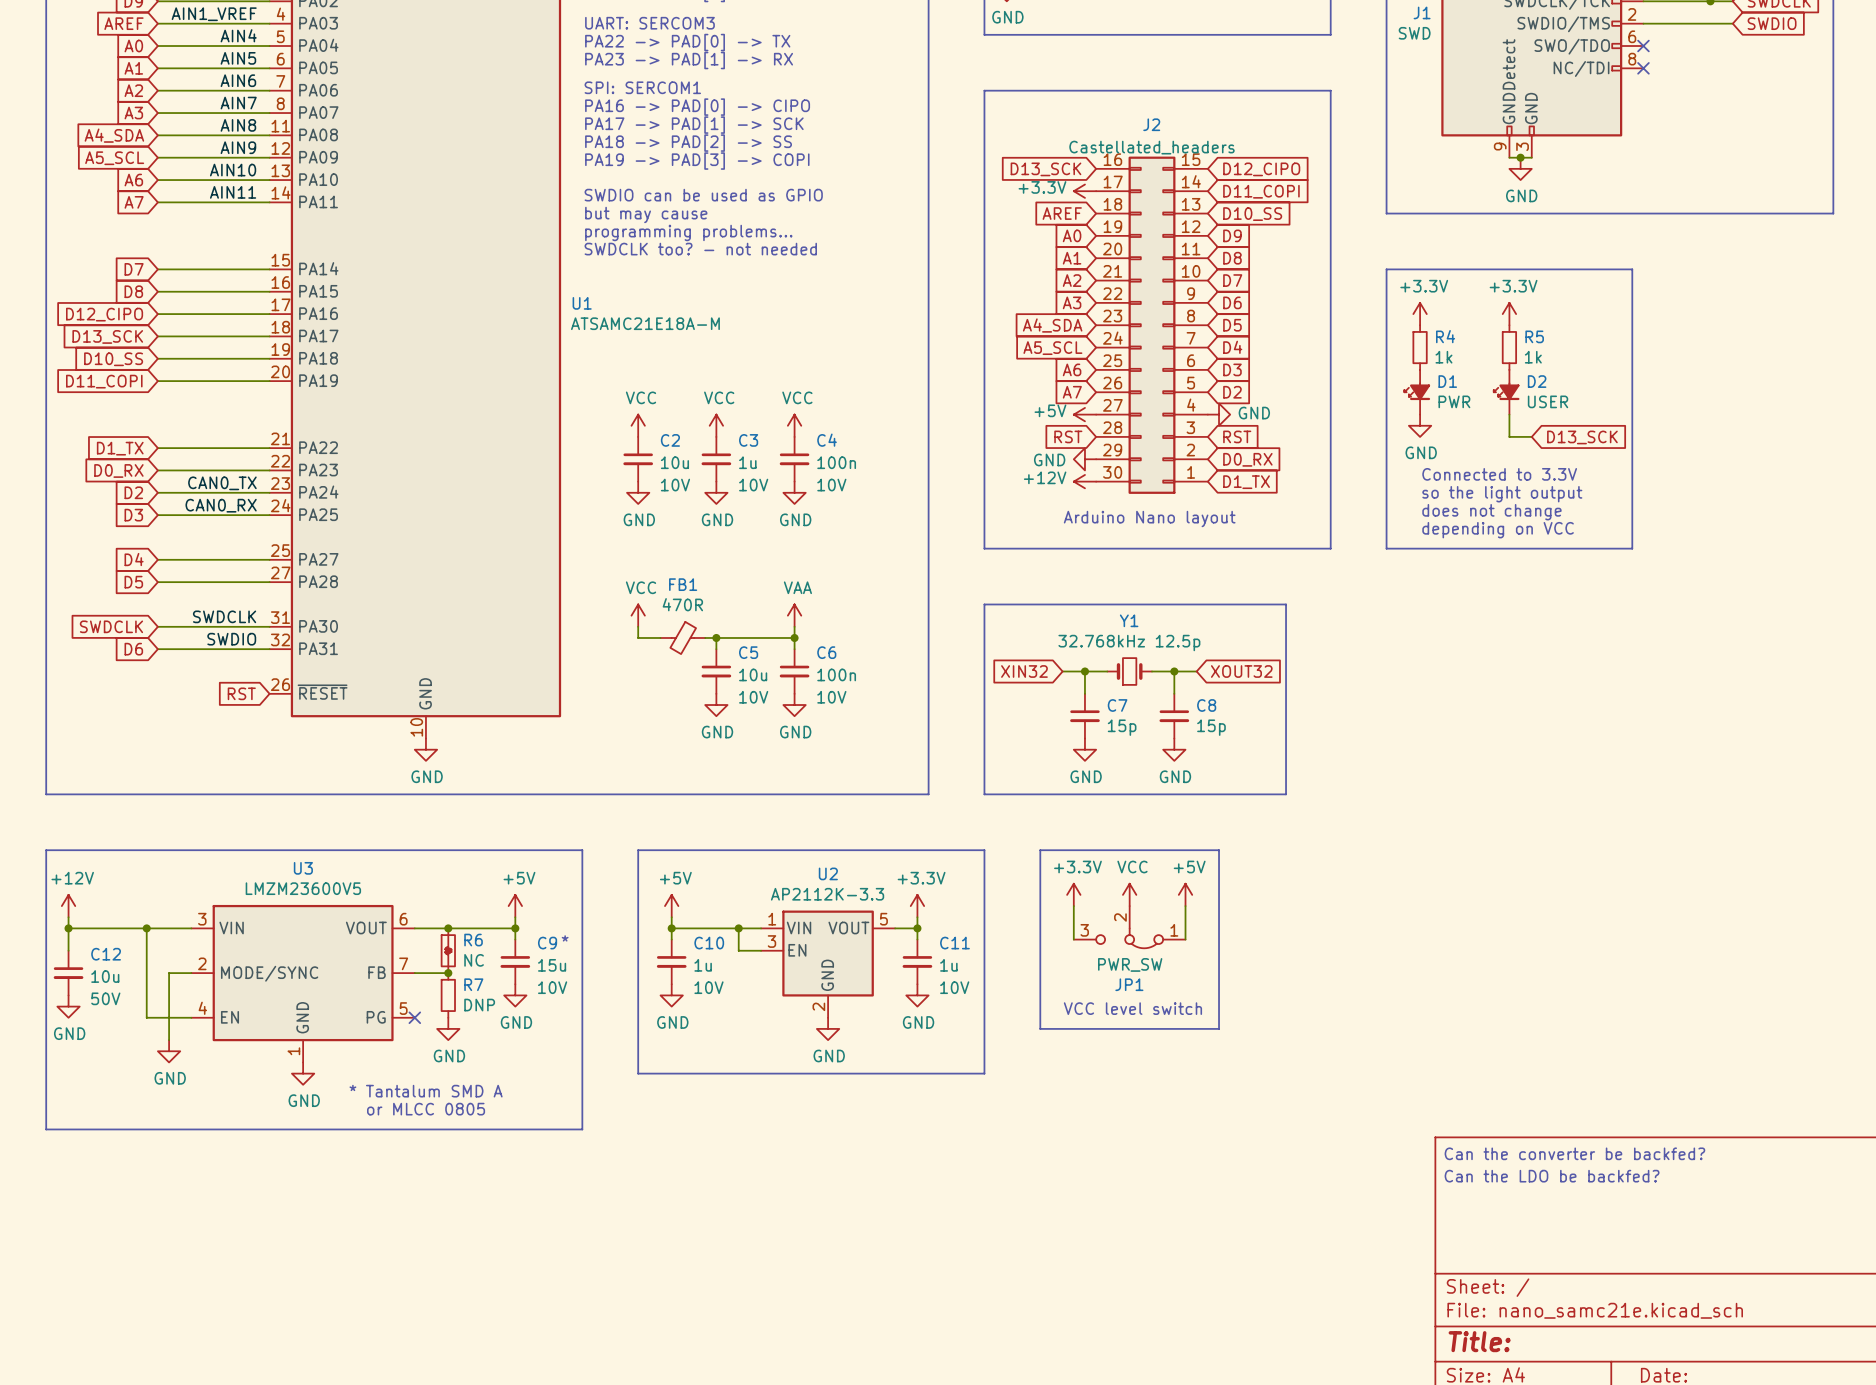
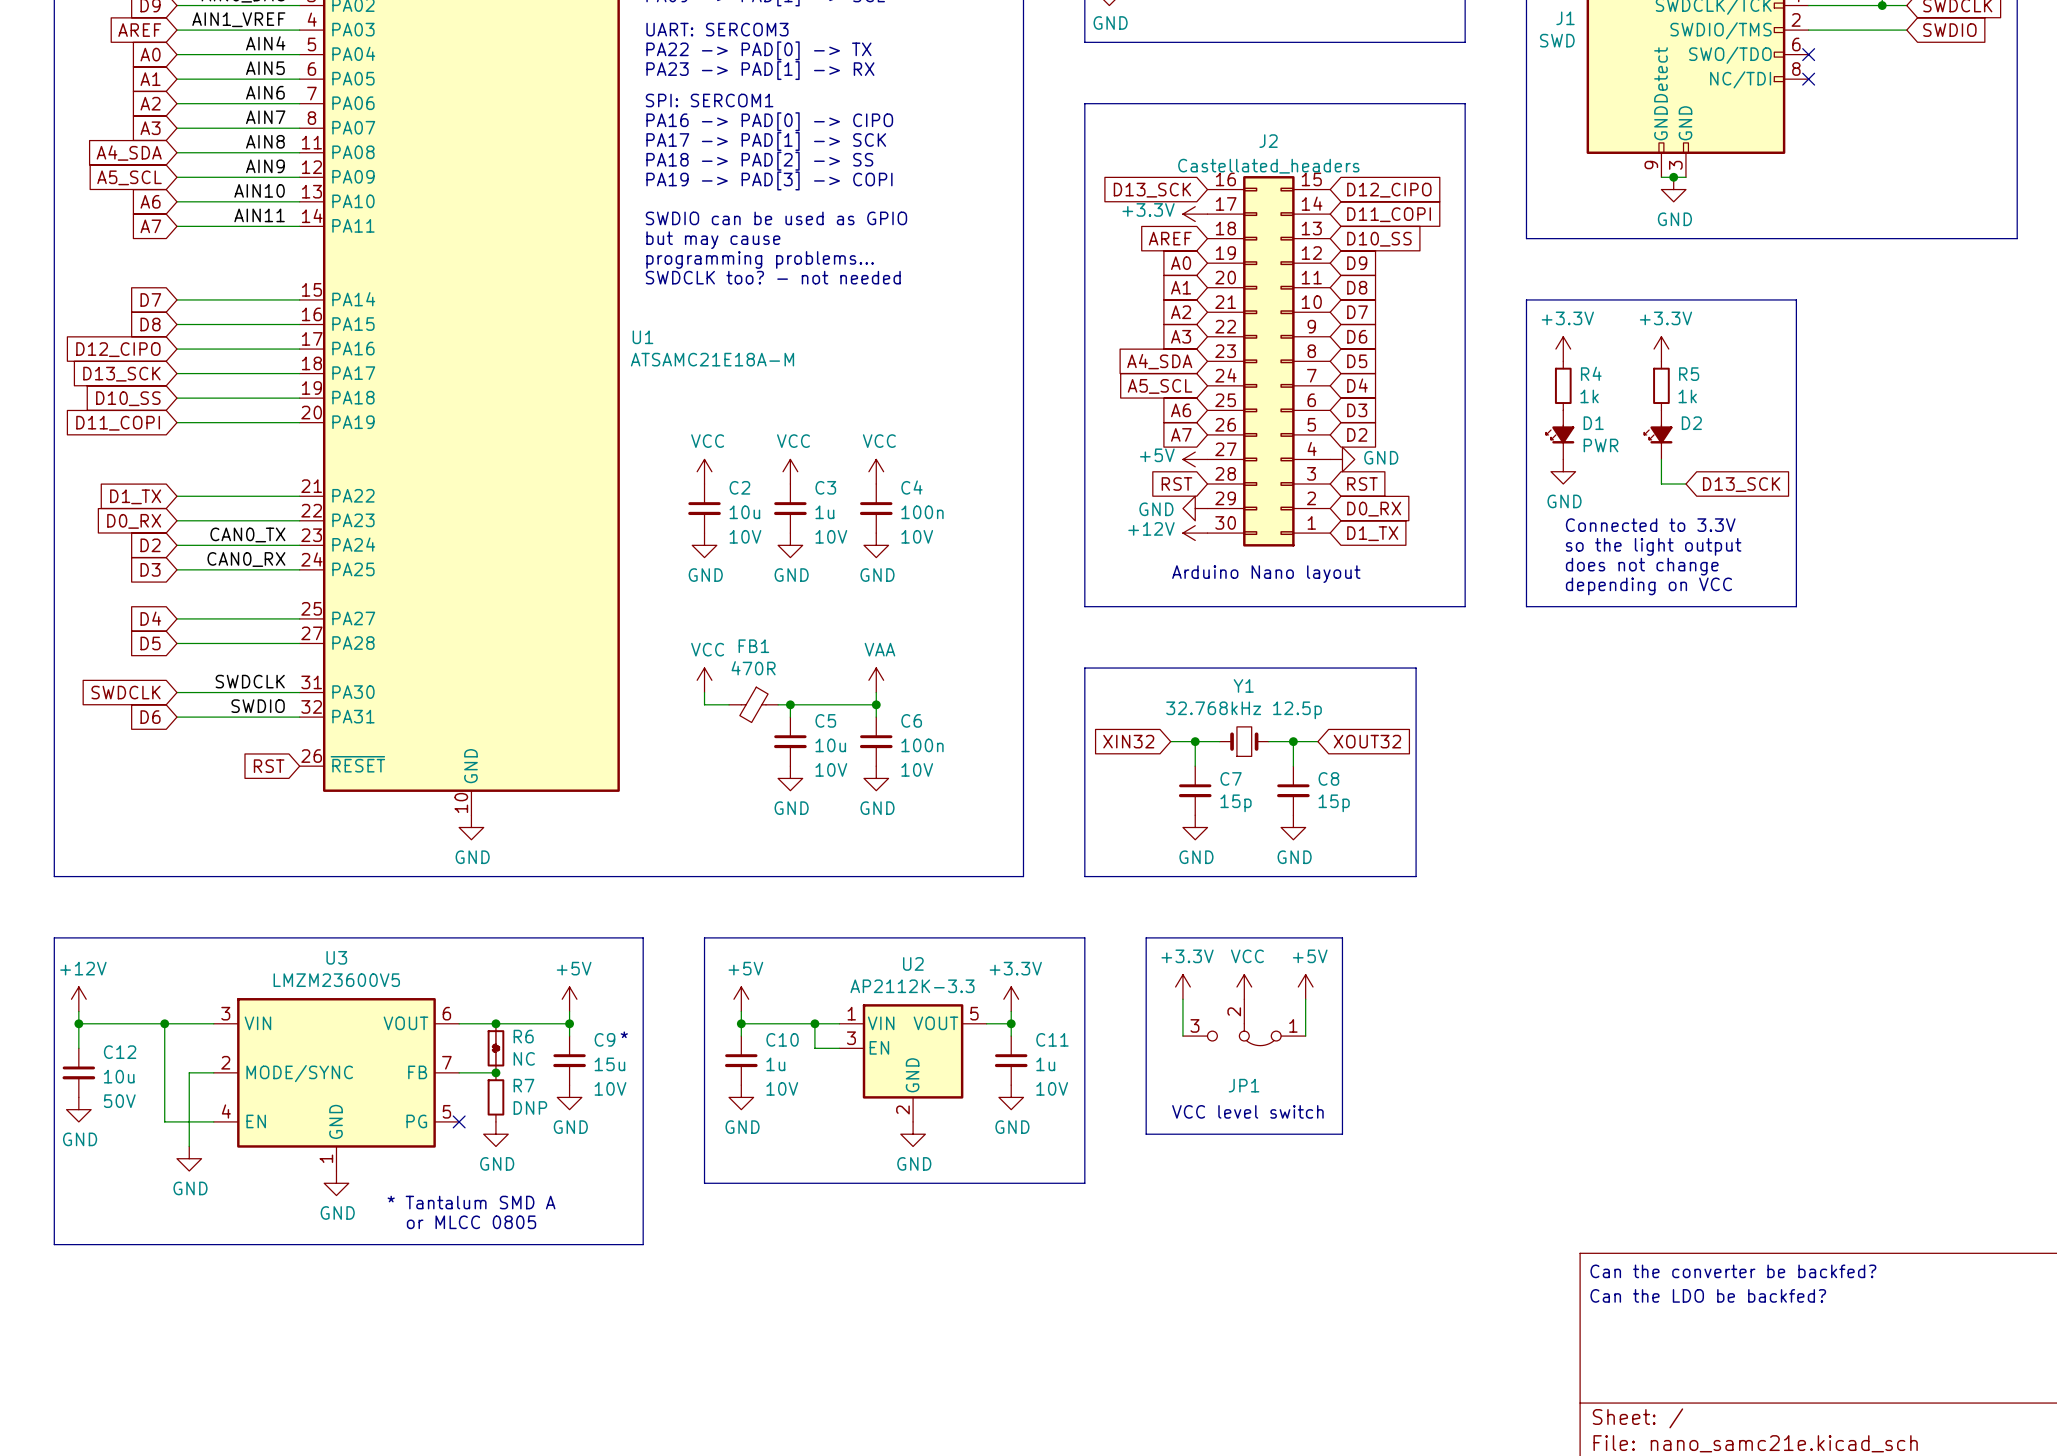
D2 value: USER (1548, 401) -> none
JP1 value: PWR_SW (1130, 964) -> none

